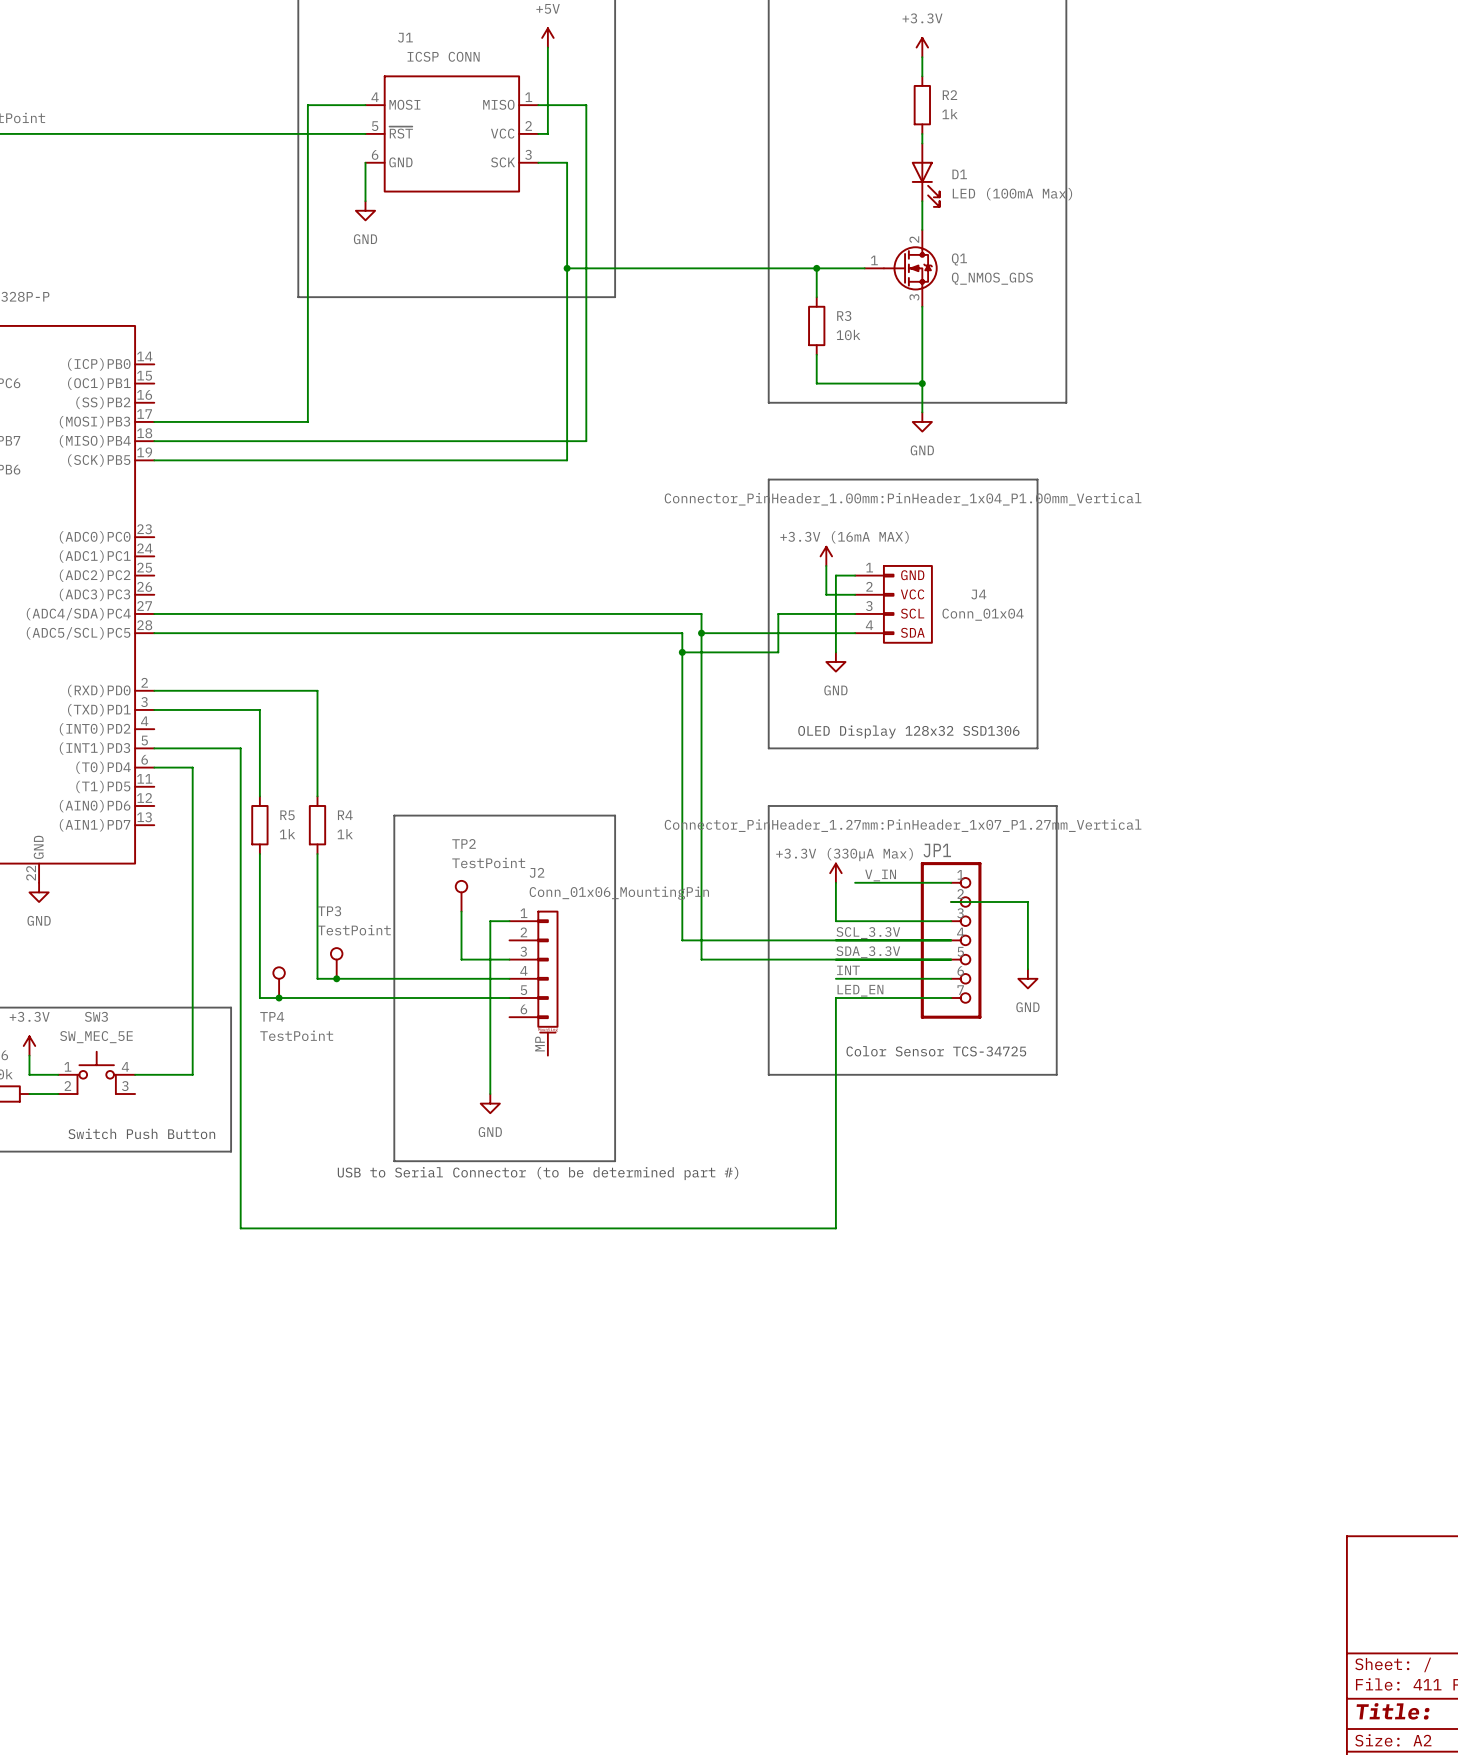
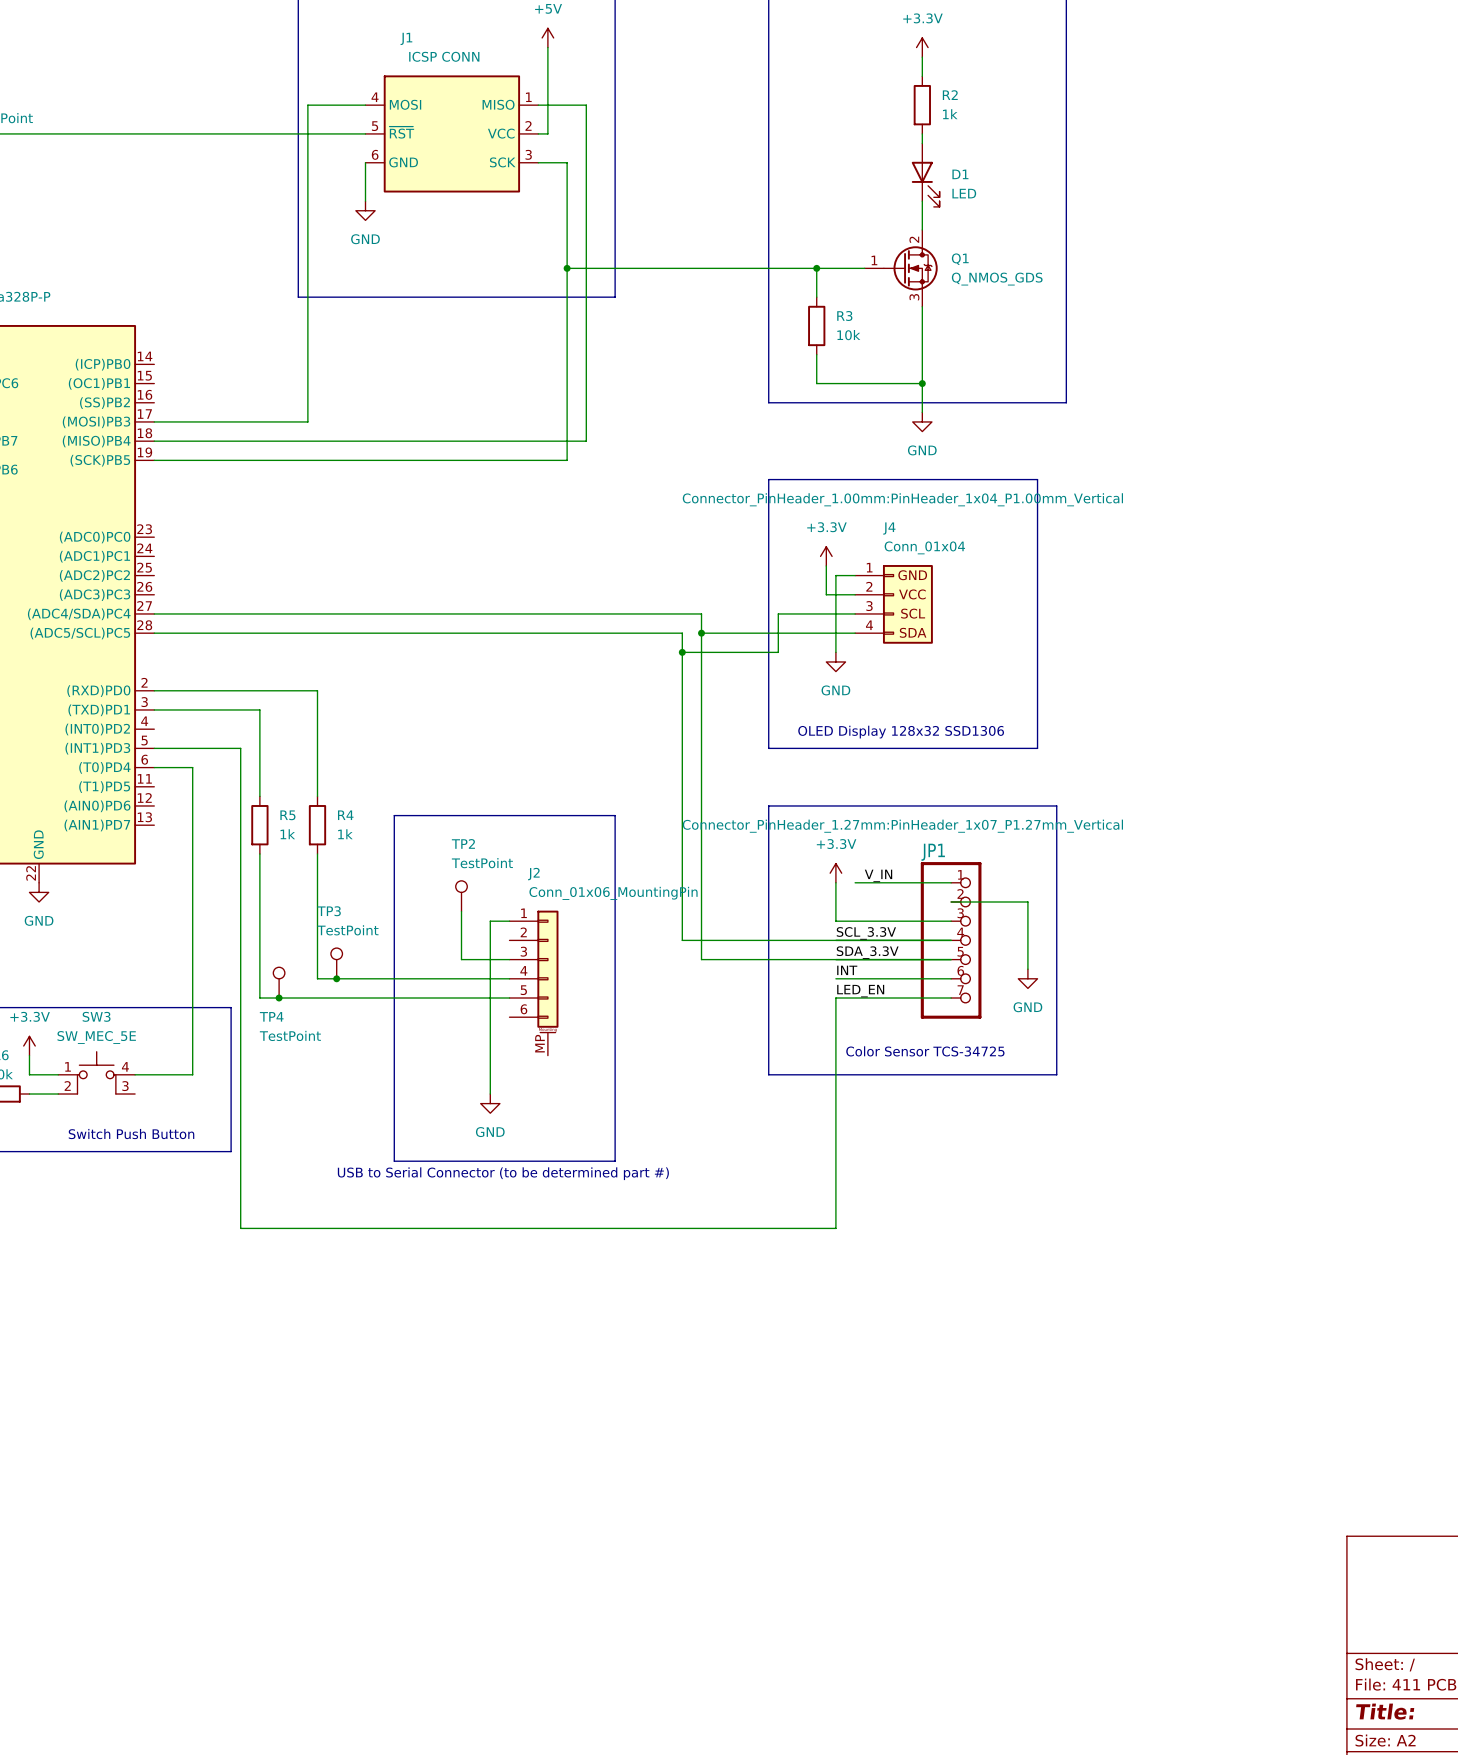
D1 value: LED (100mA Max) (1012, 194) -> LED (964, 193)
power symbol: +3.3V (16mA MAX) (826, 556) -> +3.3V (826, 556)
J4 name position: J4 (978, 594) -> J4 (889, 528)
J4 value position: Conn_01x04 (983, 614) -> Conn_01x04 (924, 547)
power symbol: +3.3V (330µA Max) (835, 873) -> +3.3V (835, 873)

